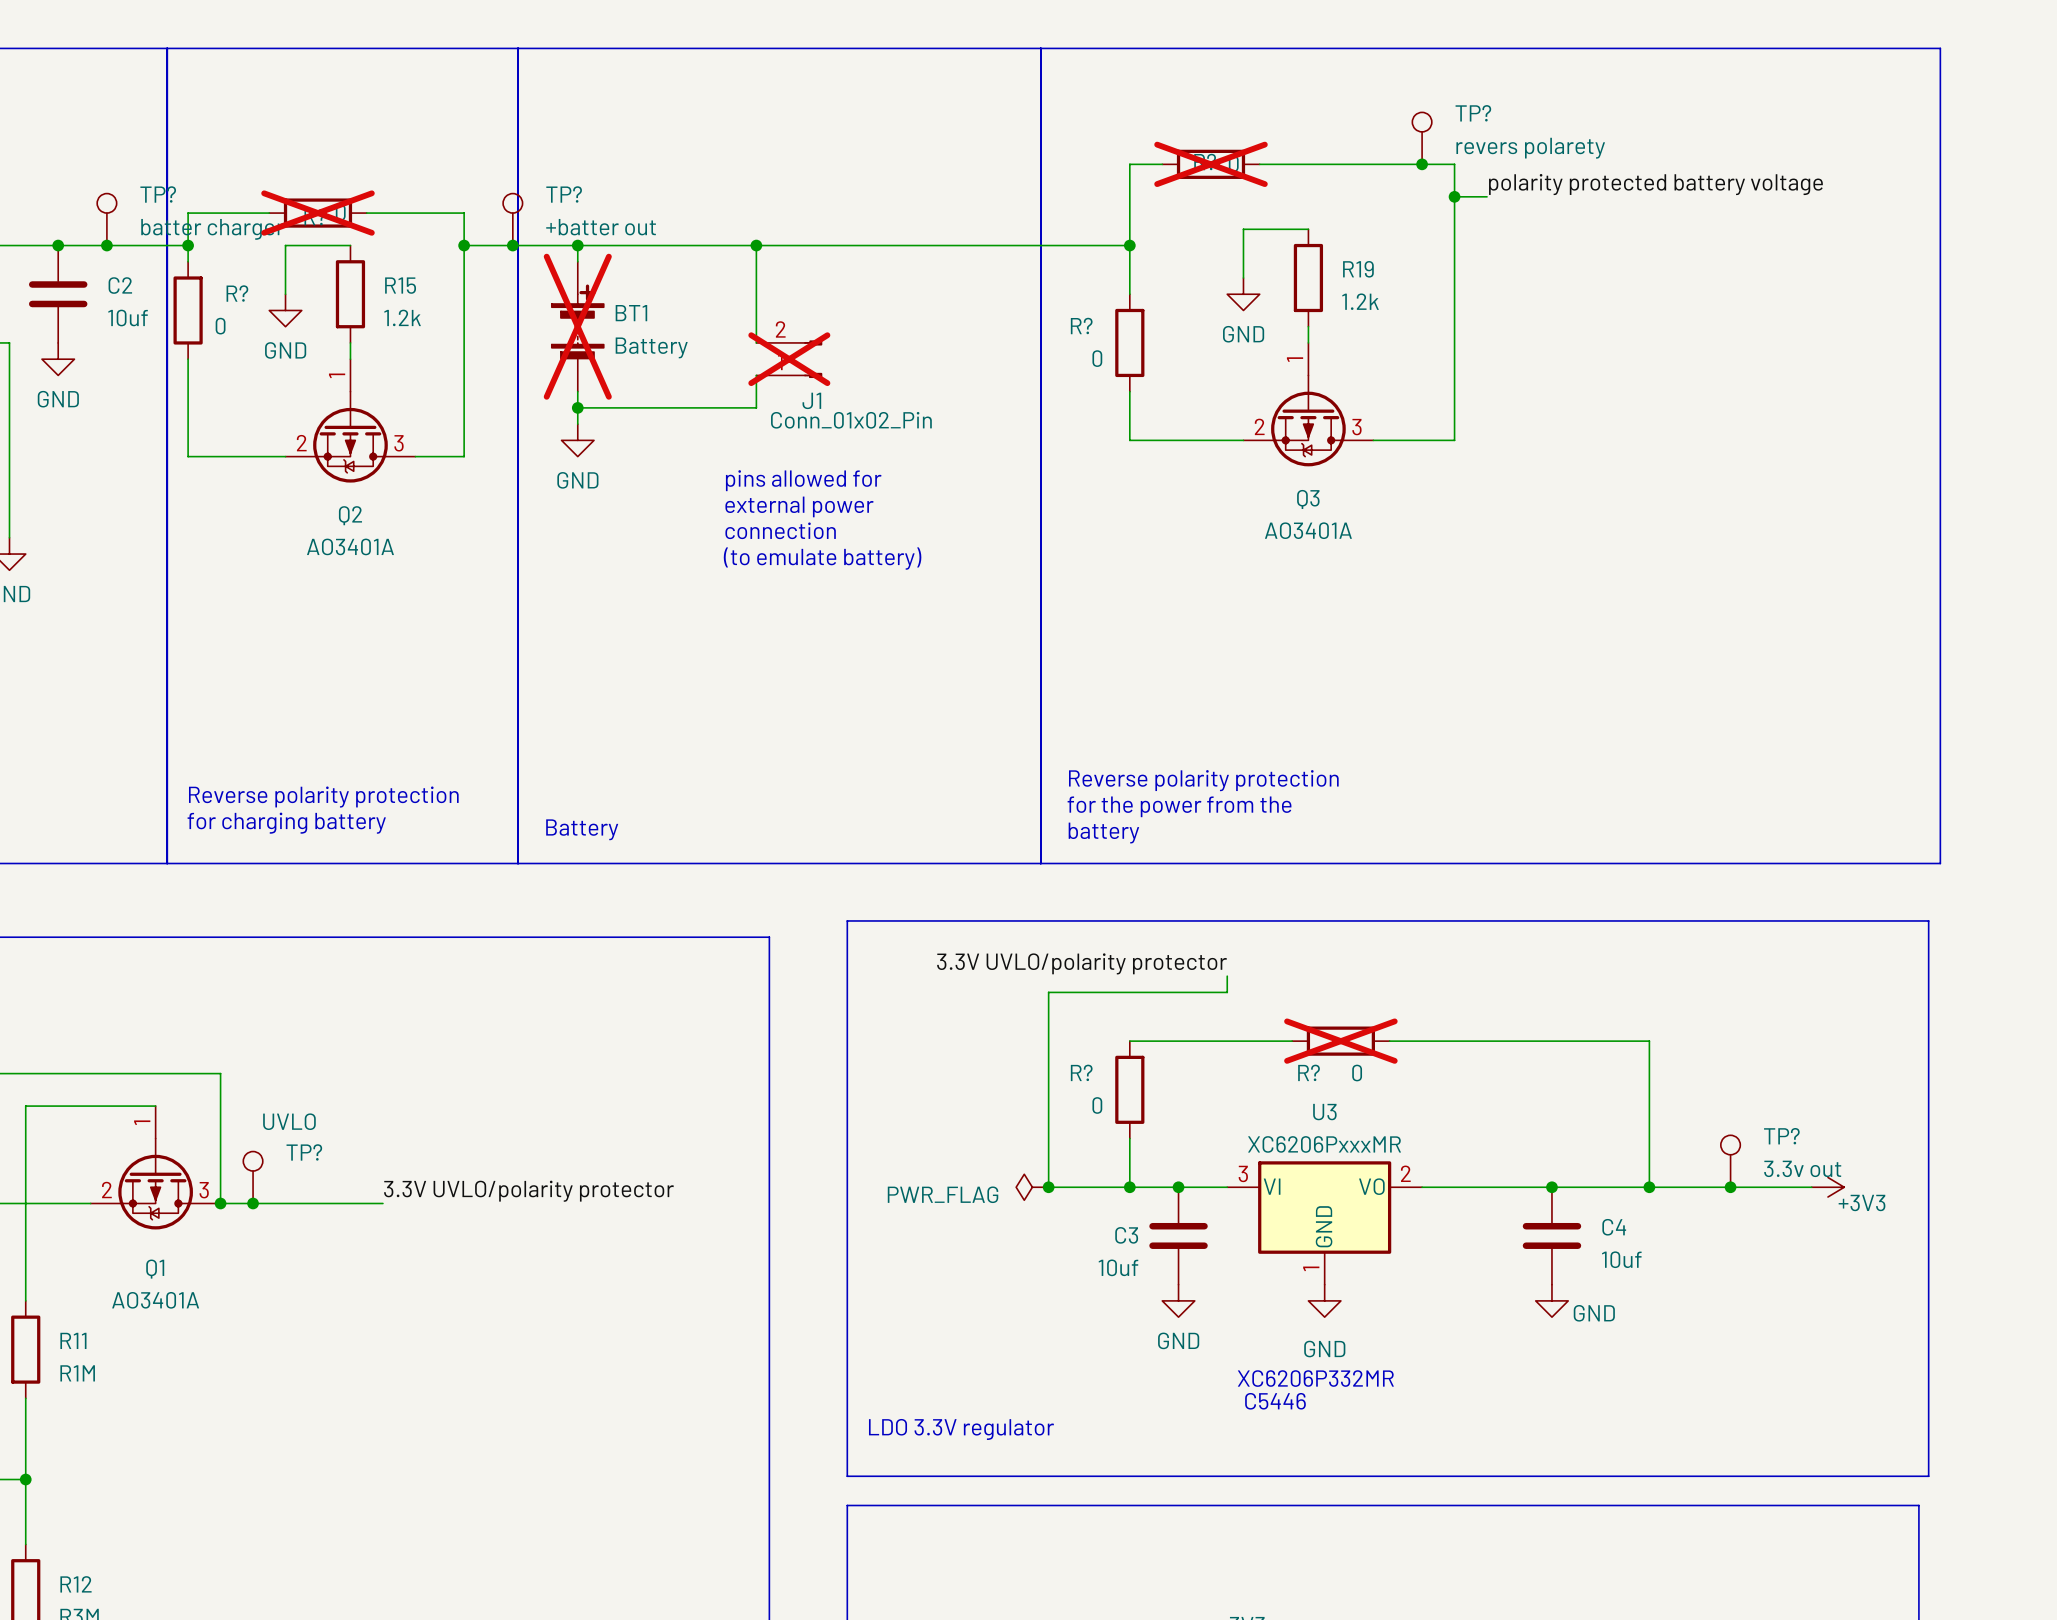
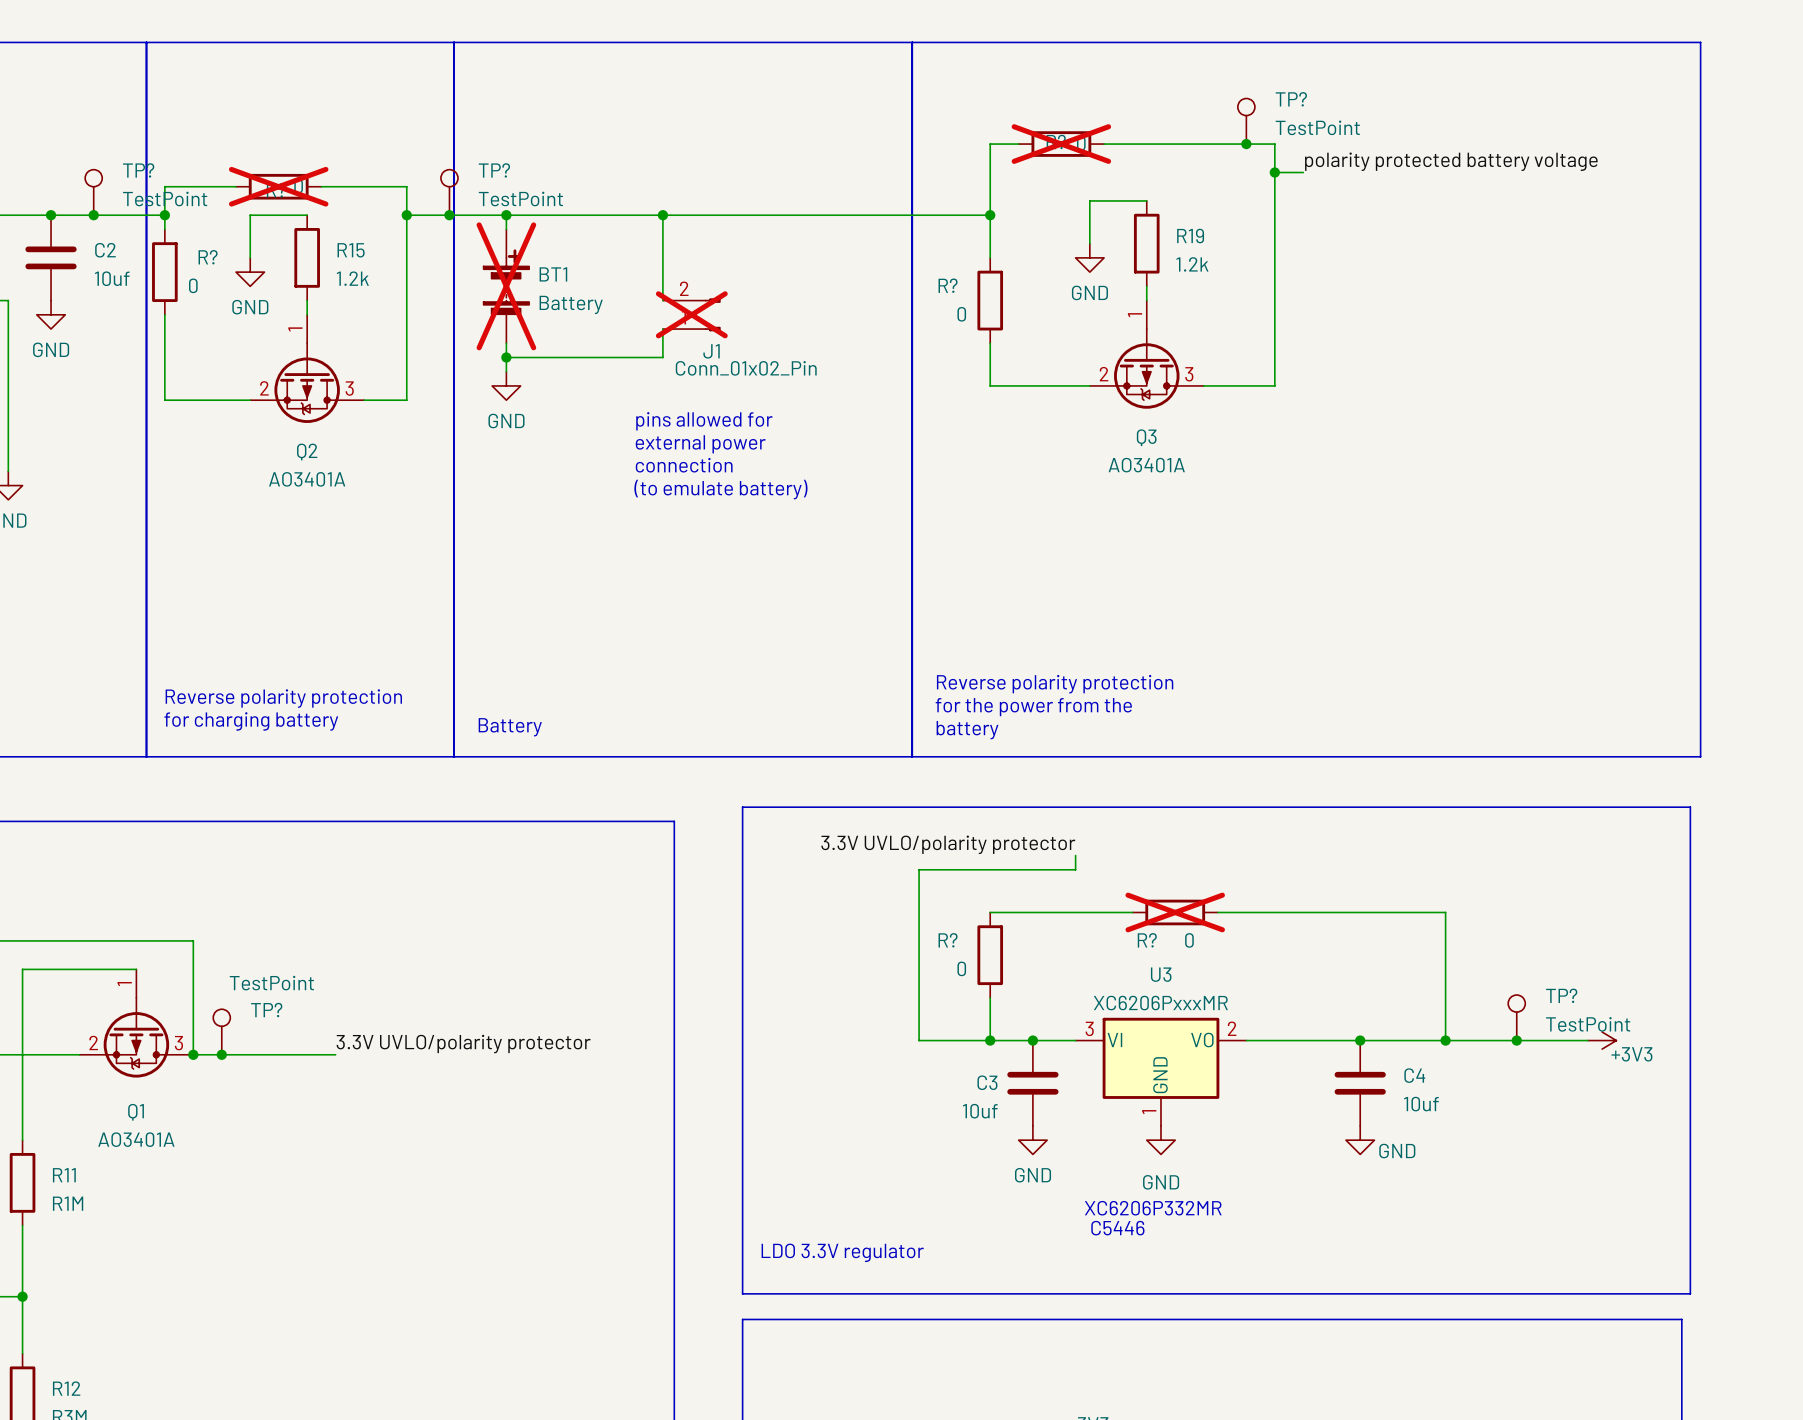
TP? value: revers polarety (1530, 148) -> TestPoint (1317, 127)
TP? value: +batter out (601, 227) -> TestPoint (520, 199)
TP? value: batter charger (212, 229) -> TestPoint (165, 199)
TP? value: UVLO (289, 1121) -> TestPoint (271, 983)
TP? value: 3.3v out (1802, 1168) -> TestPoint (1588, 1024)
power symbol: PWR_FLAG (1032, 1187) -> none
junction: (1048, 1187) -> none

